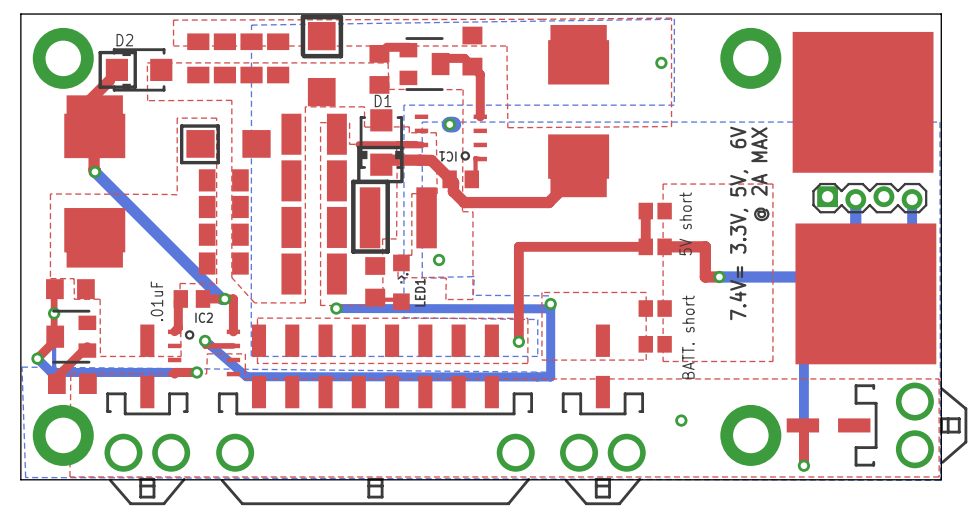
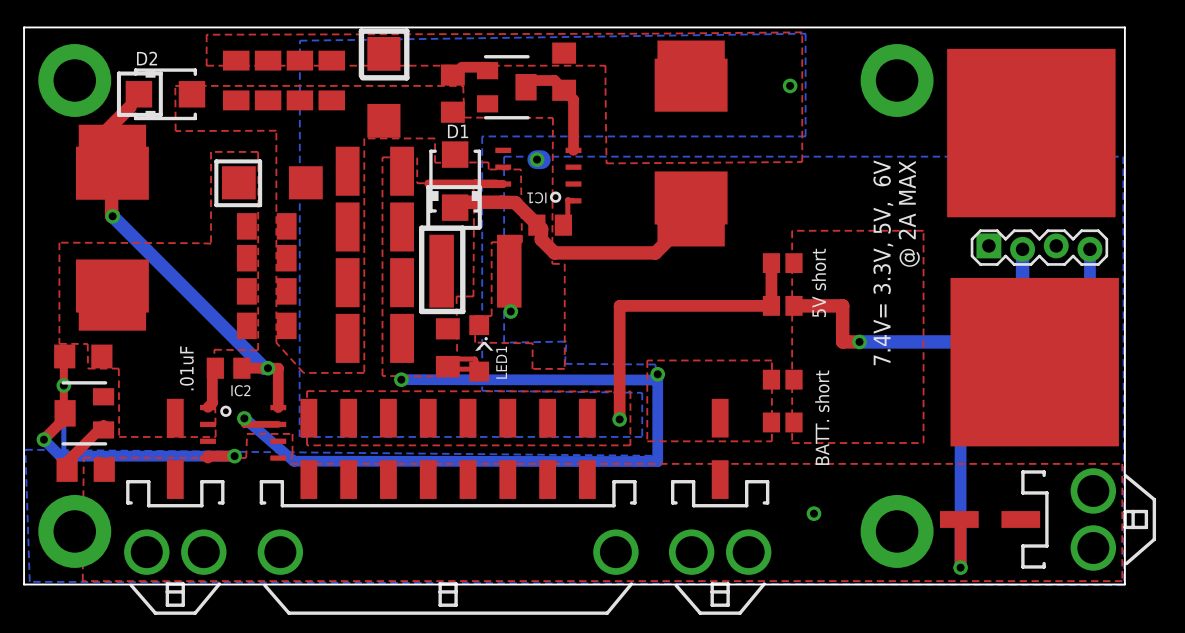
via position: (439, 260) -> (510, 311)
top track: none -> (447, 363) (448, 359) (474, 359) (479, 368)

